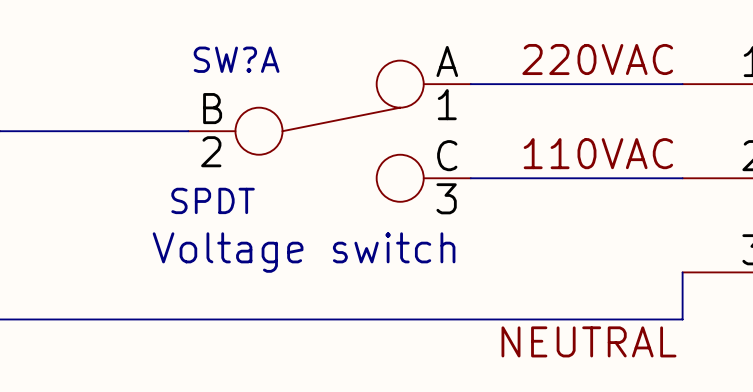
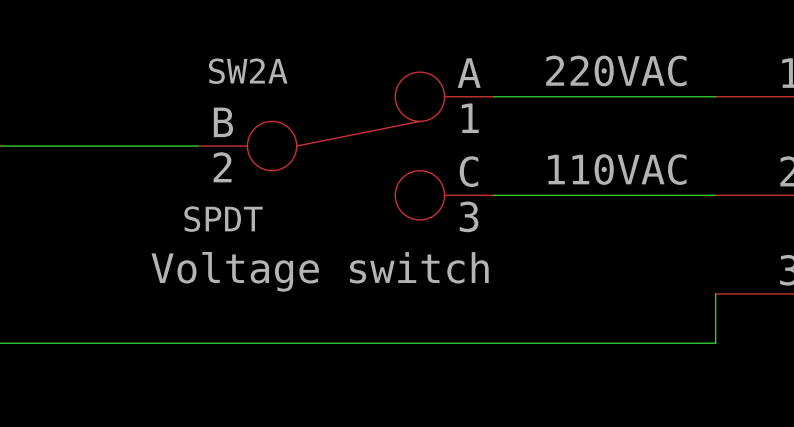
SW?A name: SW?A (236, 59) -> SW2A (248, 71)
label: NEUTRAL (588, 341) -> none

